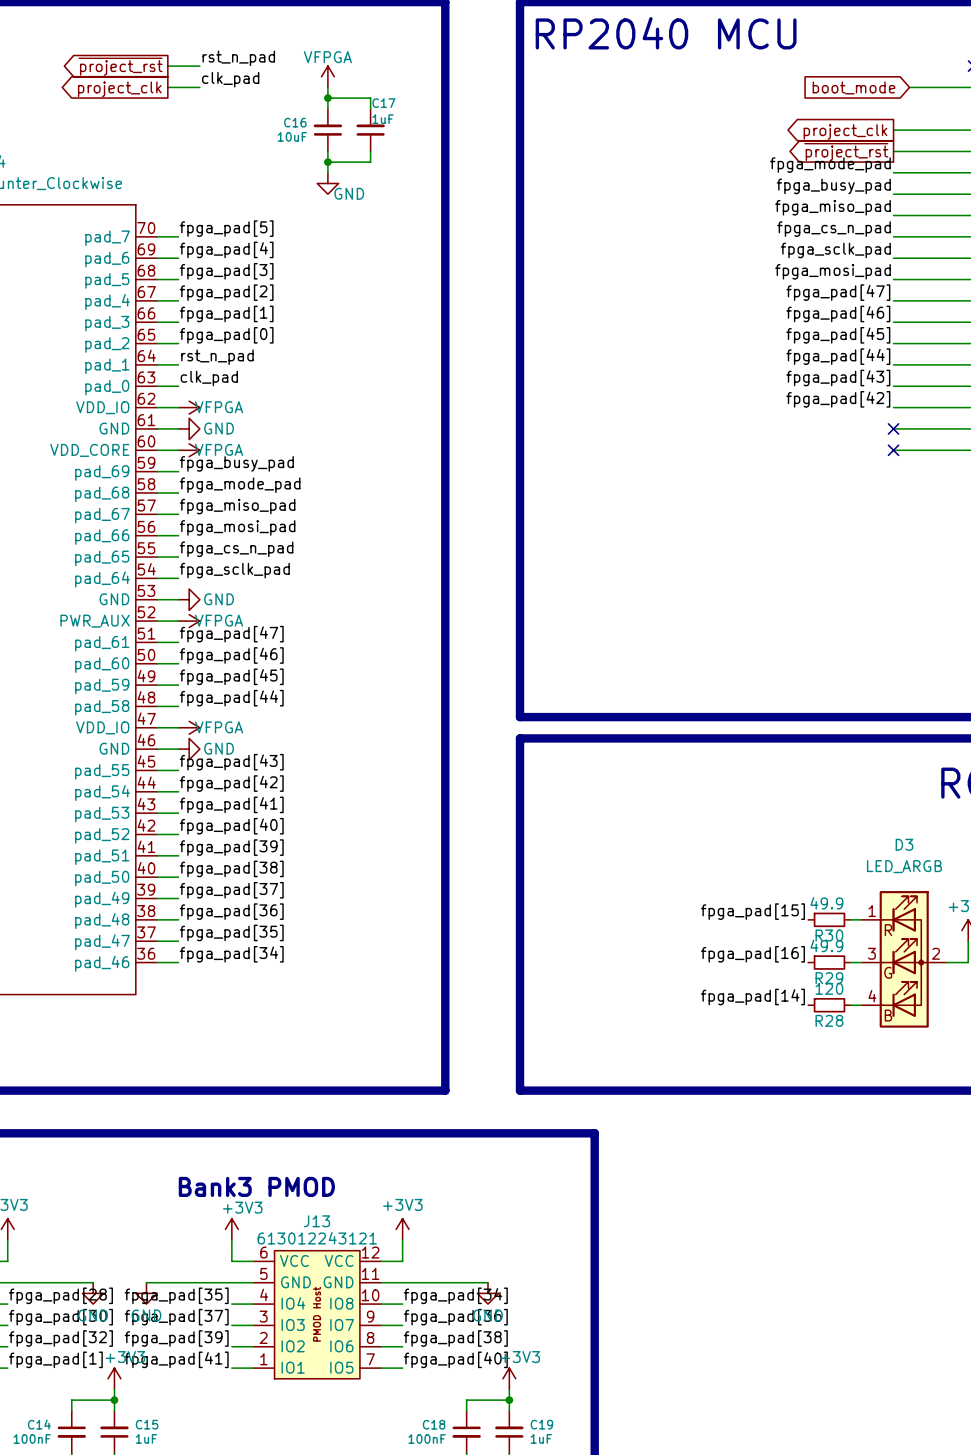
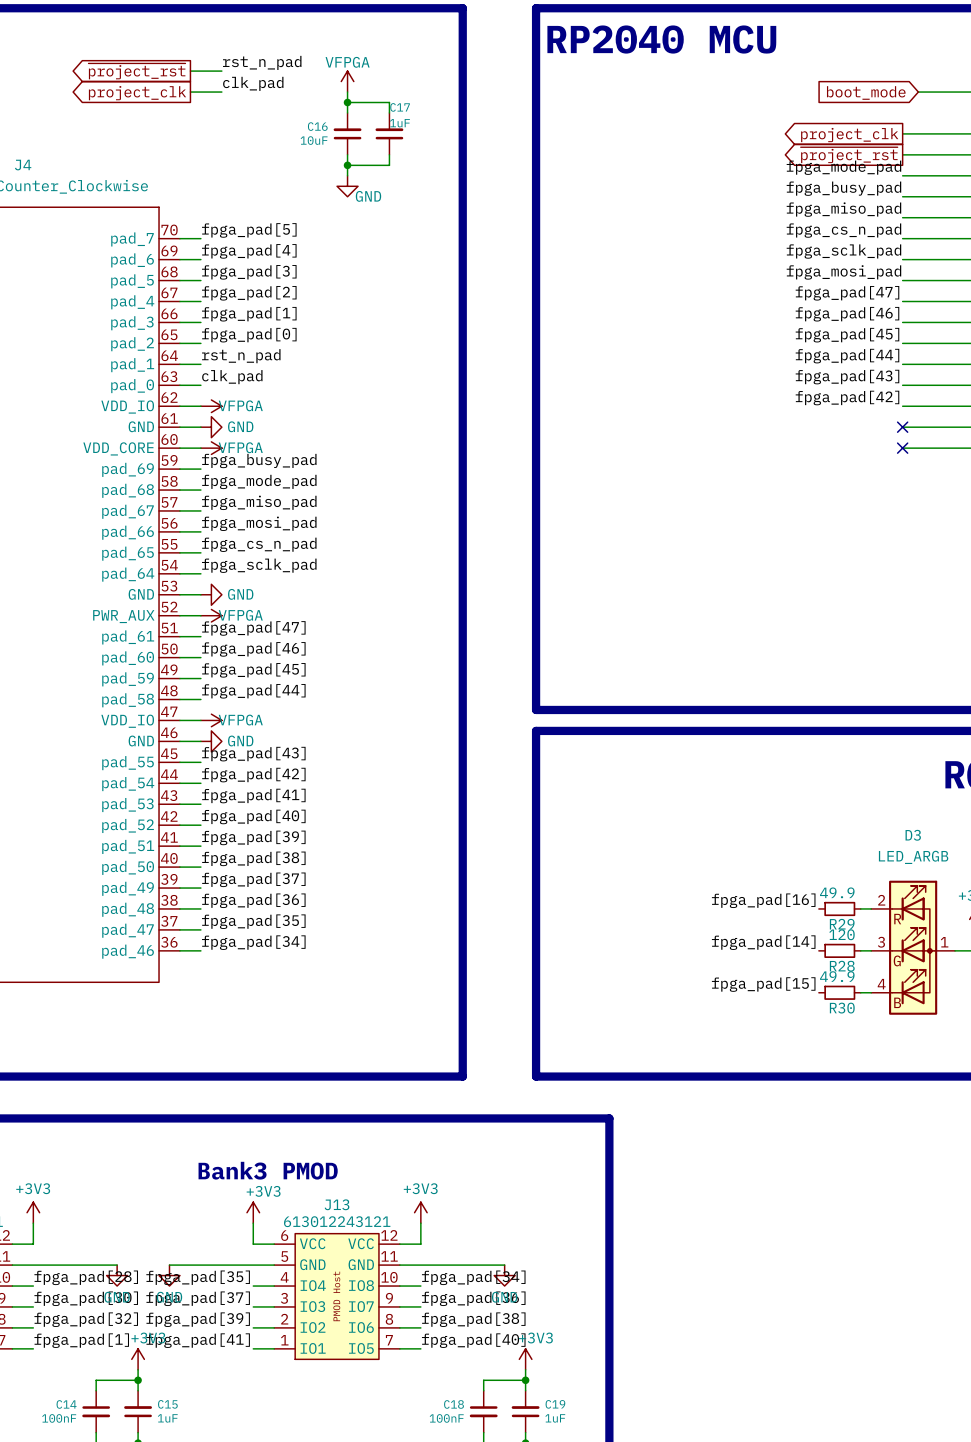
label: fpga_pad[15] (752, 911) -> fpga_pad[16] (763, 900)
D3 pin number: 1 (872, 911) -> 2 (881, 900)
R30 name: R30 (829, 935) -> R29 (842, 924)
R29 value: 49.9 (826, 945) -> 120 (841, 934)
D3 pin number: 2 (935, 953) -> 1 (944, 942)
label: fpga_pad[16] (752, 954) -> fpga_pad[14] (763, 942)
R29 name: R29 (829, 978) -> R28 (842, 966)
R28 value: 120 (829, 988) -> 49.9 (837, 976)
label: fpga_pad[14] (752, 996) -> fpga_pad[15] (763, 984)
R28 name: R28 (829, 1020) -> R30 (842, 1008)

